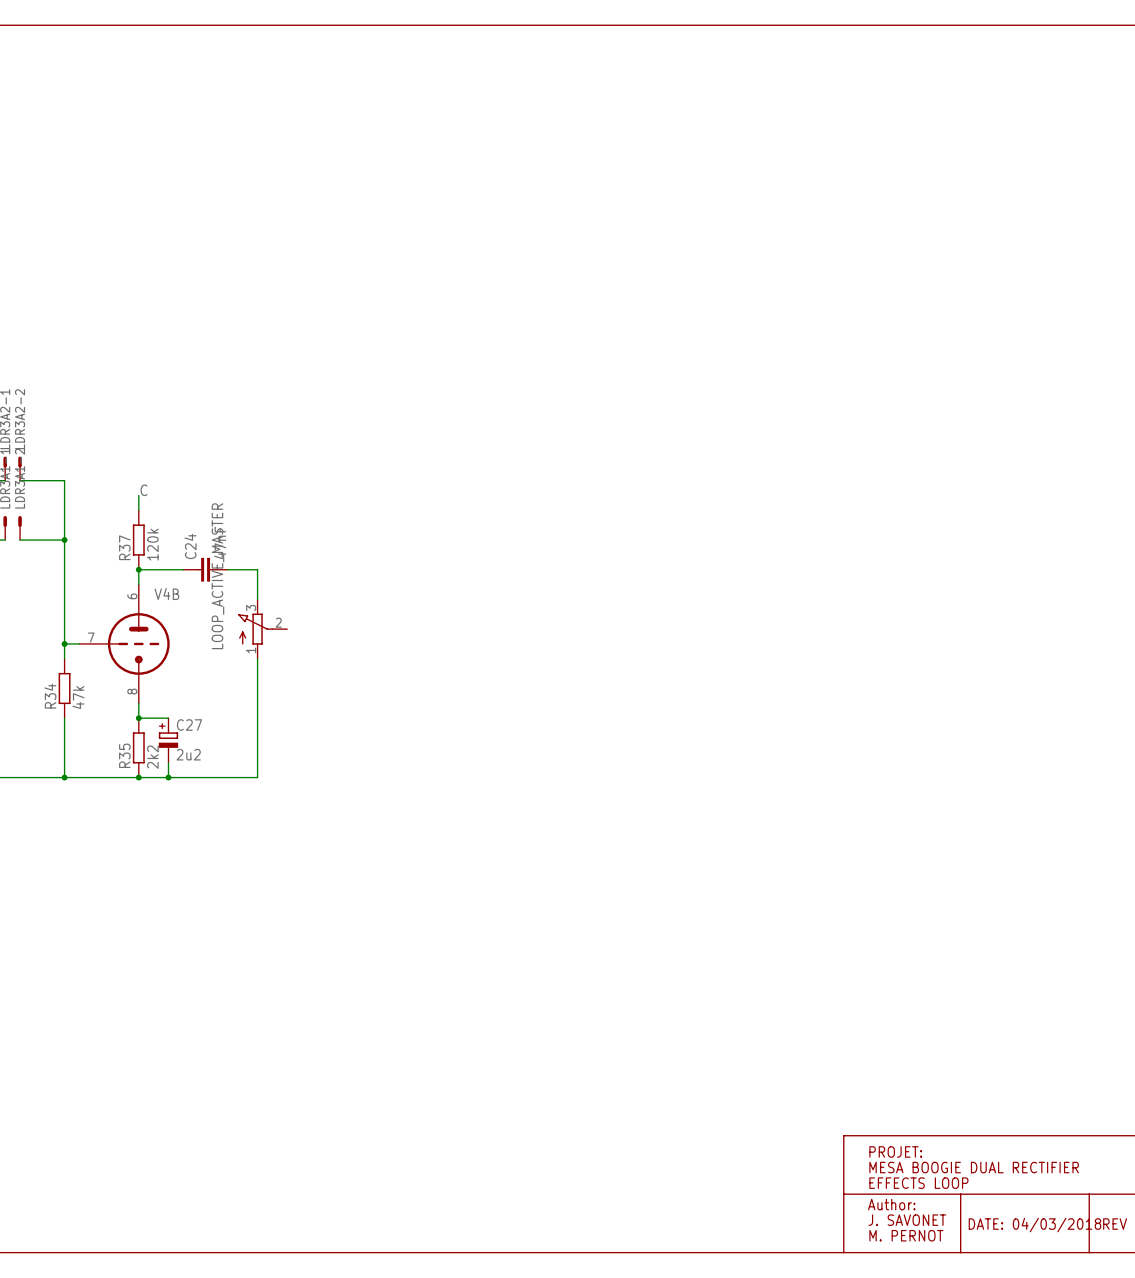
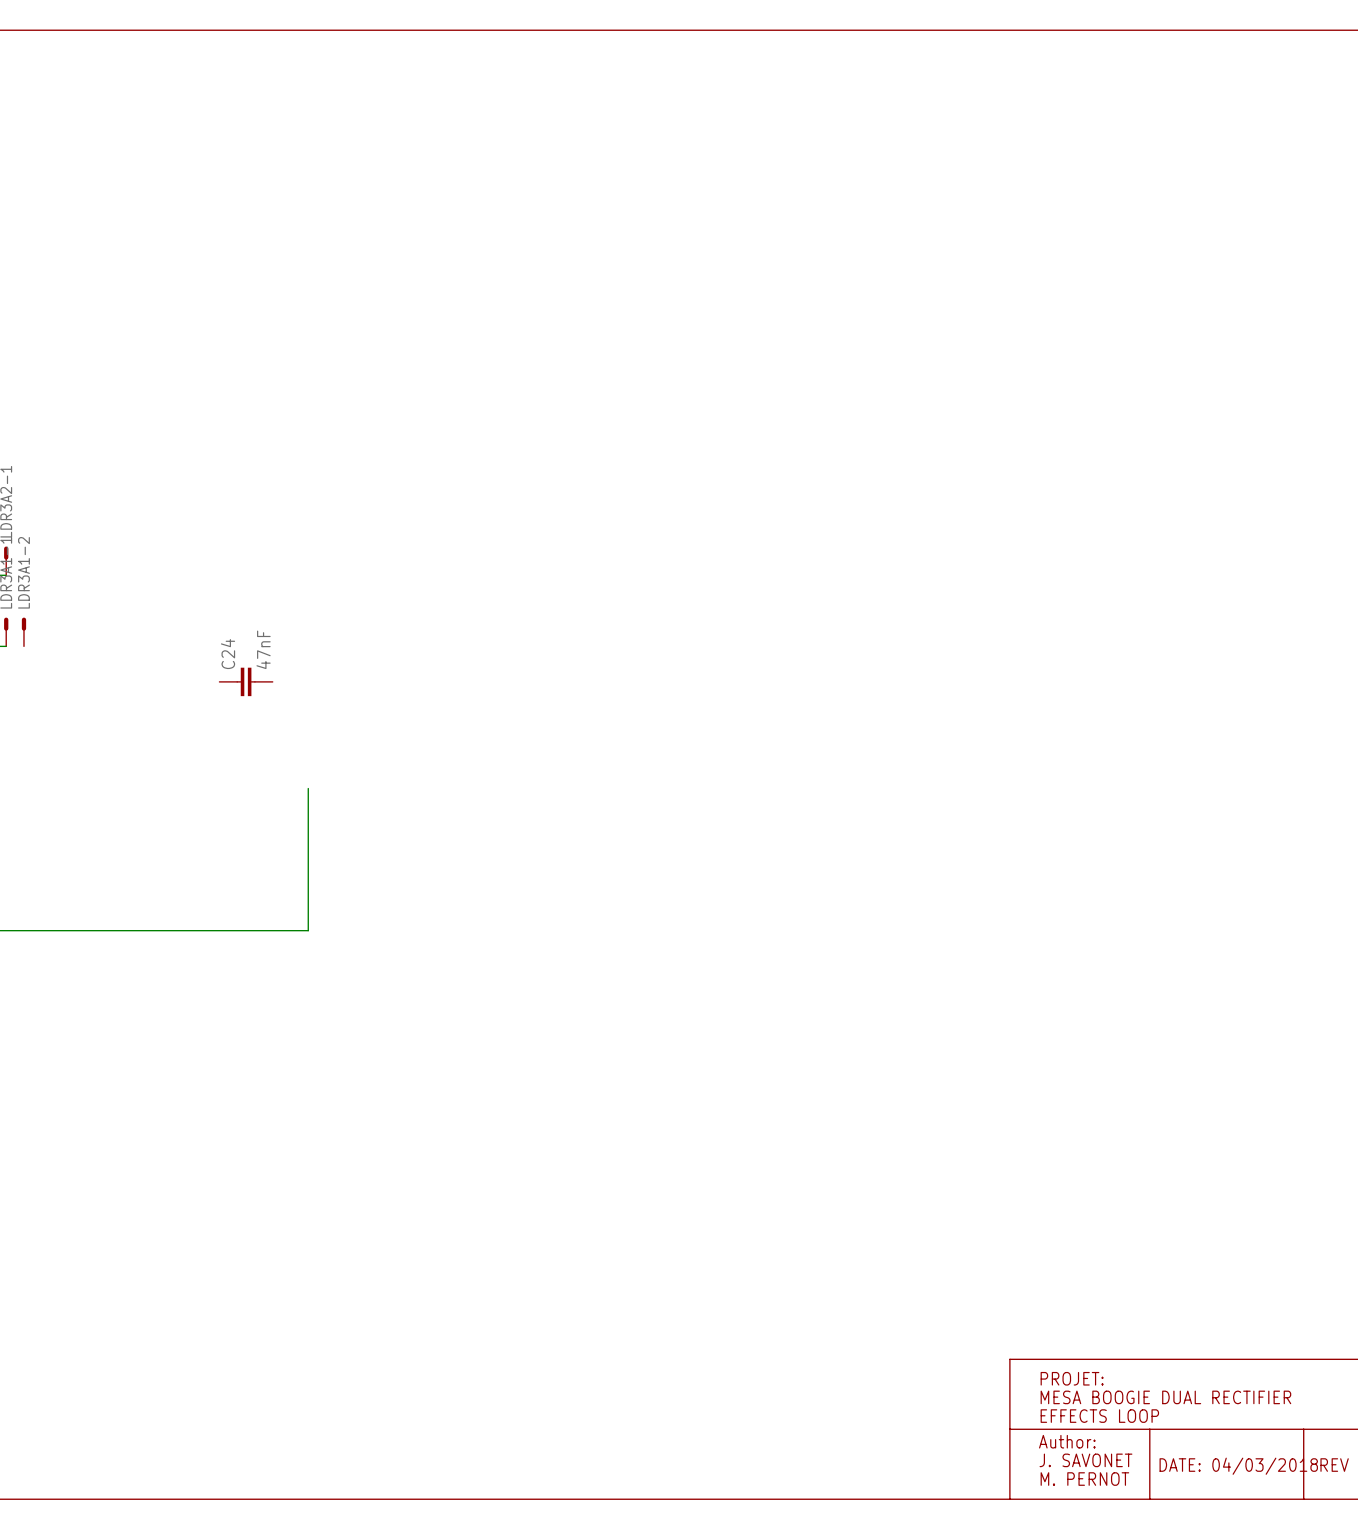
LDR3A2-2: (20, 468) -> none
wire: (20, 480) (64, 480) (64, 658) -> none
label: C (144, 490) -> none
wire: (138, 495) (138, 510) -> none
wire: (20, 540) (64, 540) -> none
junction: (64, 540) -> none
R37: 120k (138, 540) -> none
junction: (138, 569) -> none
wire: (183, 569) (138, 569) (138, 584) -> none
wire: (227, 569) (257, 569) (257, 599) -> none
LOOP_ACTIVE_MASTER: (262, 629) -> none
wire: (64, 643) (79, 643) -> none
junction: (64, 643) -> none
V4B: (124, 643) -> none
R34: 47k (64, 688) -> none
wire: (138, 703) (138, 718) (168, 718) -> none
wire: (64, 718) (64, 777) -> none
junction: (138, 718) -> none
C27: 2u2 (168, 740) -> none
R35: 2k2 (138, 747) -> none
wire: (168, 762) (168, 777) -> none
junction: (64, 777) -> none
junction: (138, 777) -> none
junction: (168, 777) -> none

